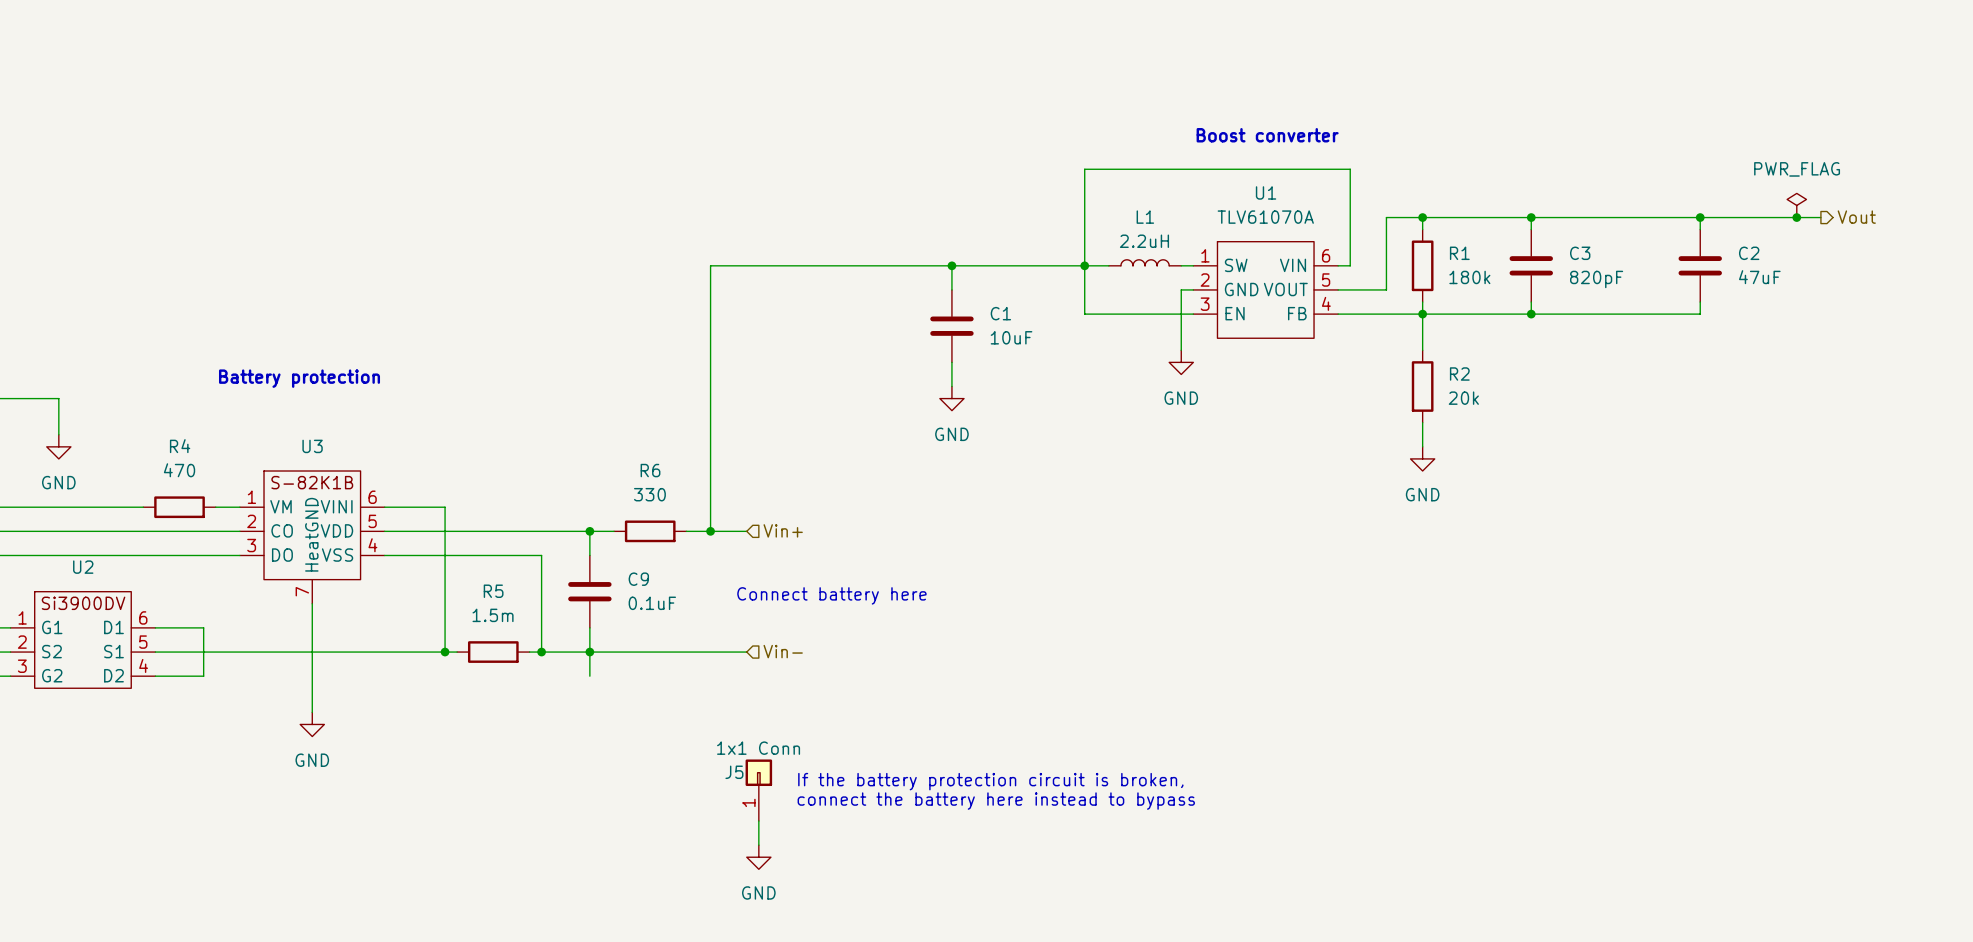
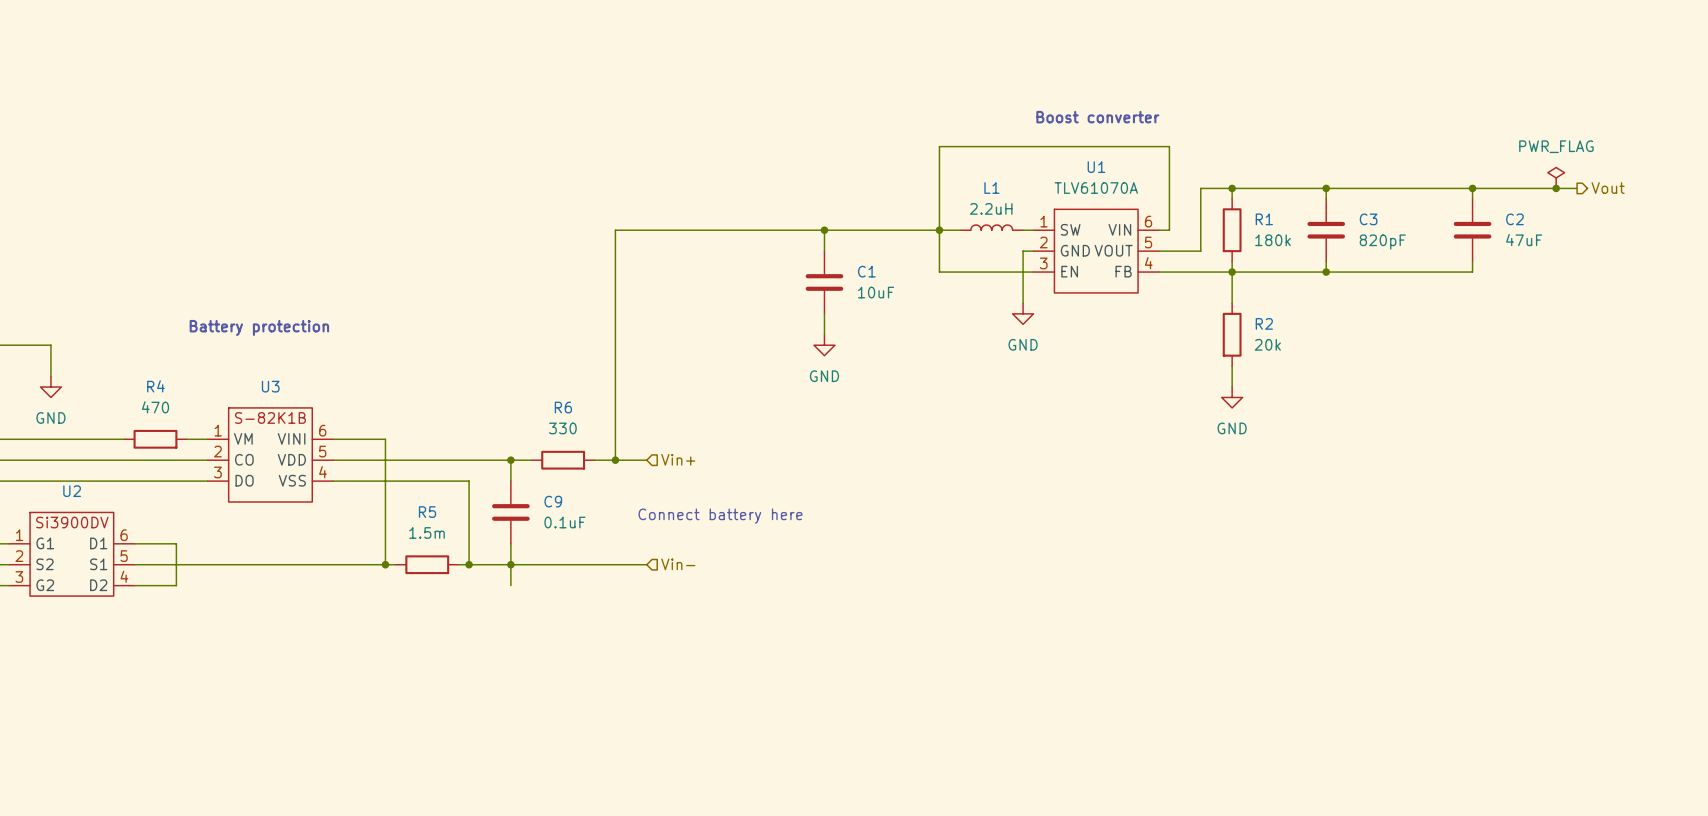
U3 symbol: [239, 471, 385, 604] -> [207, 407, 334, 503]
wire: (312, 603) (312, 712) -> none
power symbol: GND (312, 724) -> none
text: If the battery protection circuit is broken, (990, 781) -> none
J5: 1x1 Conn (758, 790) -> none
text: connect the battery here instead to bypass (996, 801) -> none
wire: (758, 821) (758, 845) -> none
power symbol: GND (758, 857) -> none

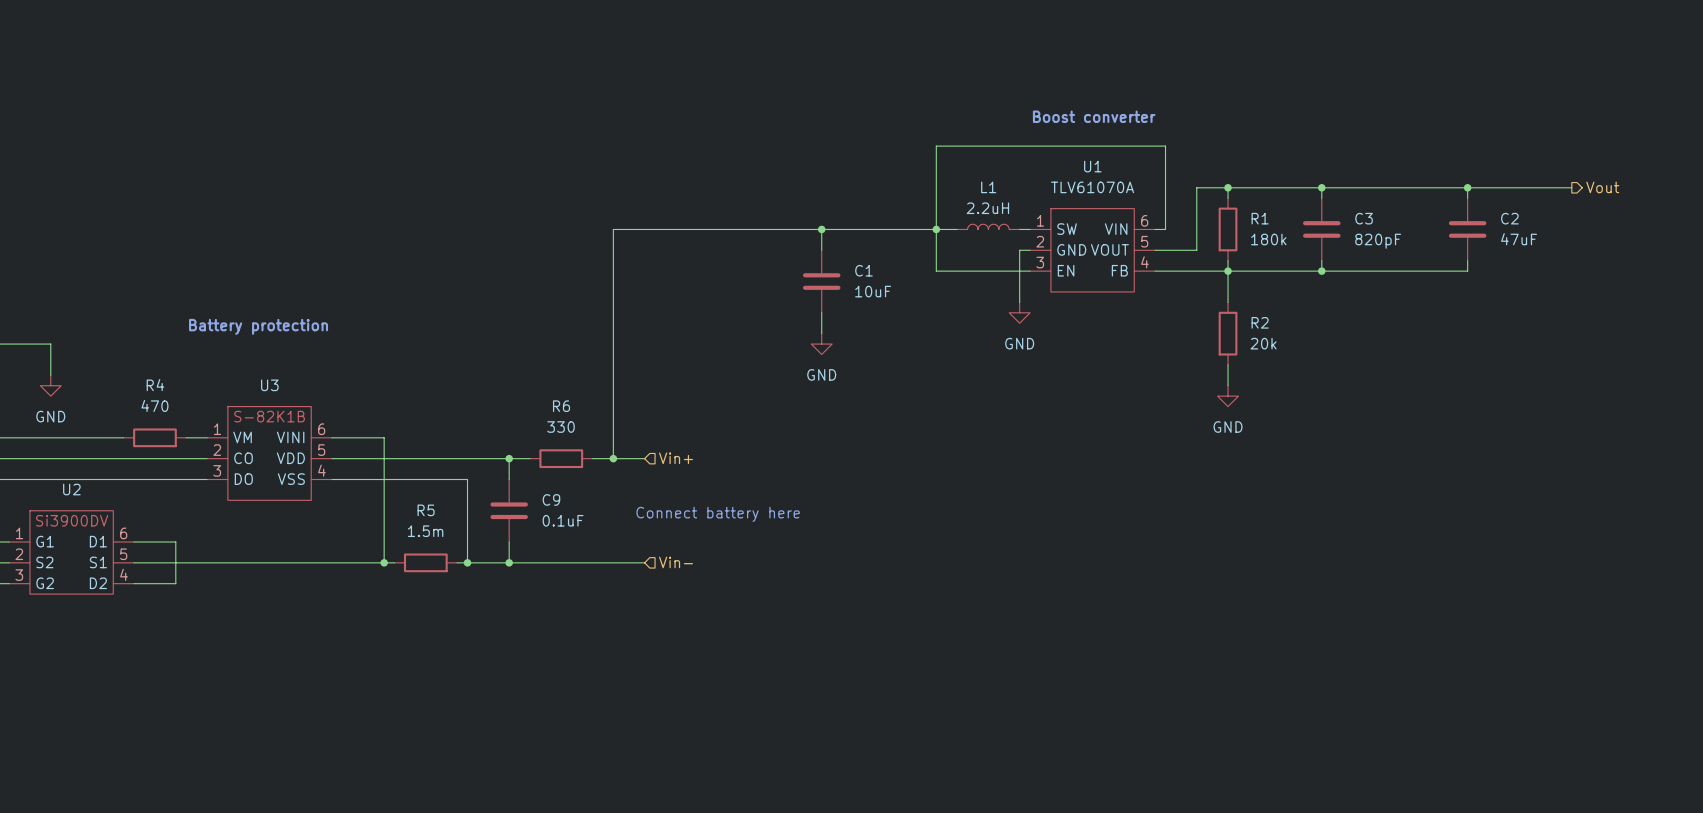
power symbol: PWR_FLAG (1556, 177) -> none
junction: (1556, 188) -> none
wire: (510, 564) (510, 585) -> none

